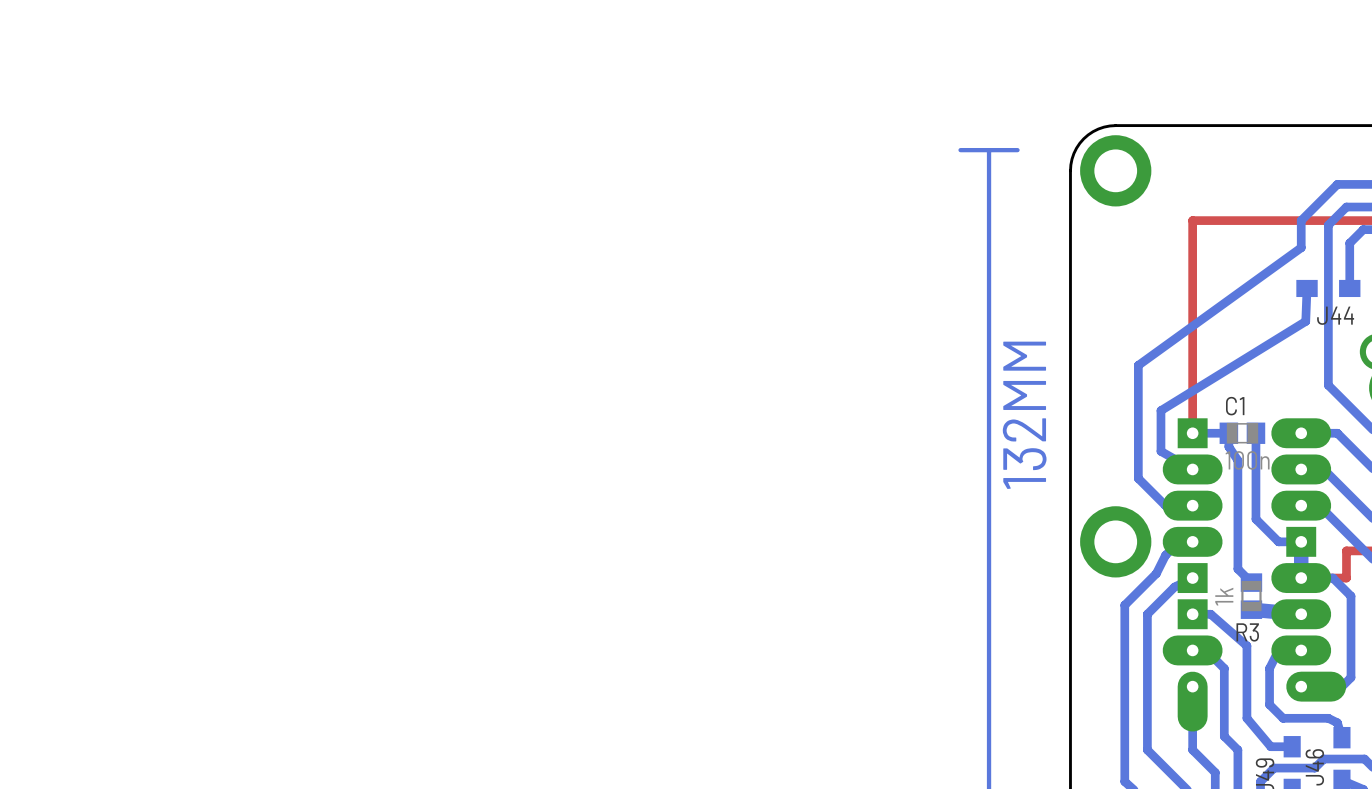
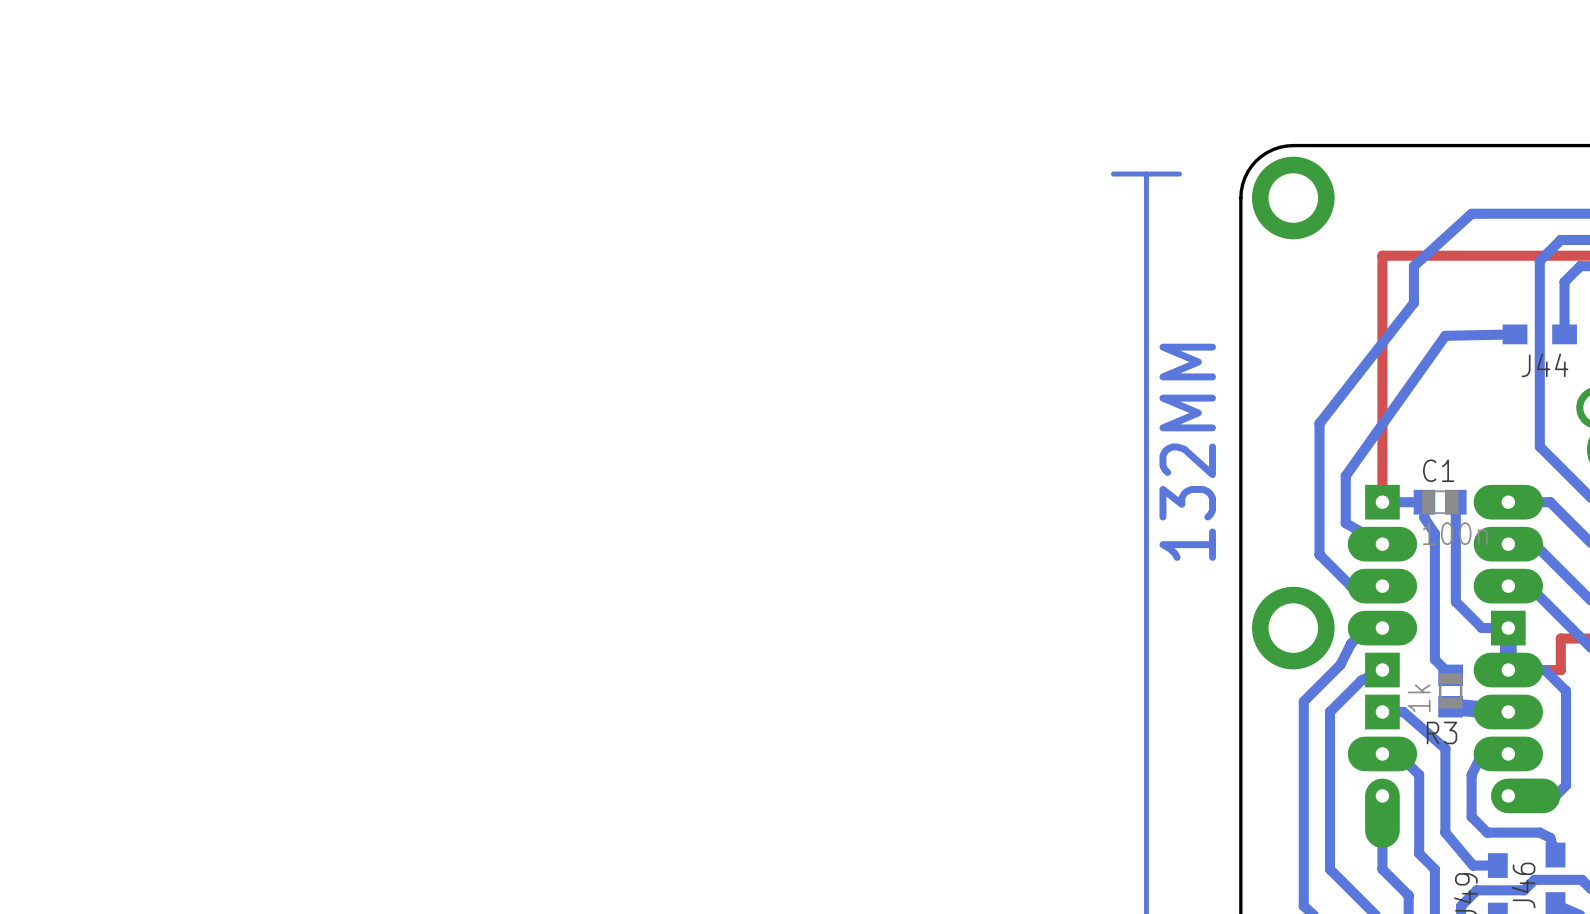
bottom track: (1337, 184) (1301, 220) (1301, 247) (1138, 365) -> (1550, 213) (1471, 213) (1413, 266) (1413, 302) (1319, 423)
bottom track: (1307, 288) (1305, 321) (1160, 410) -> (1515, 334) (1445, 335) (1345, 475)

